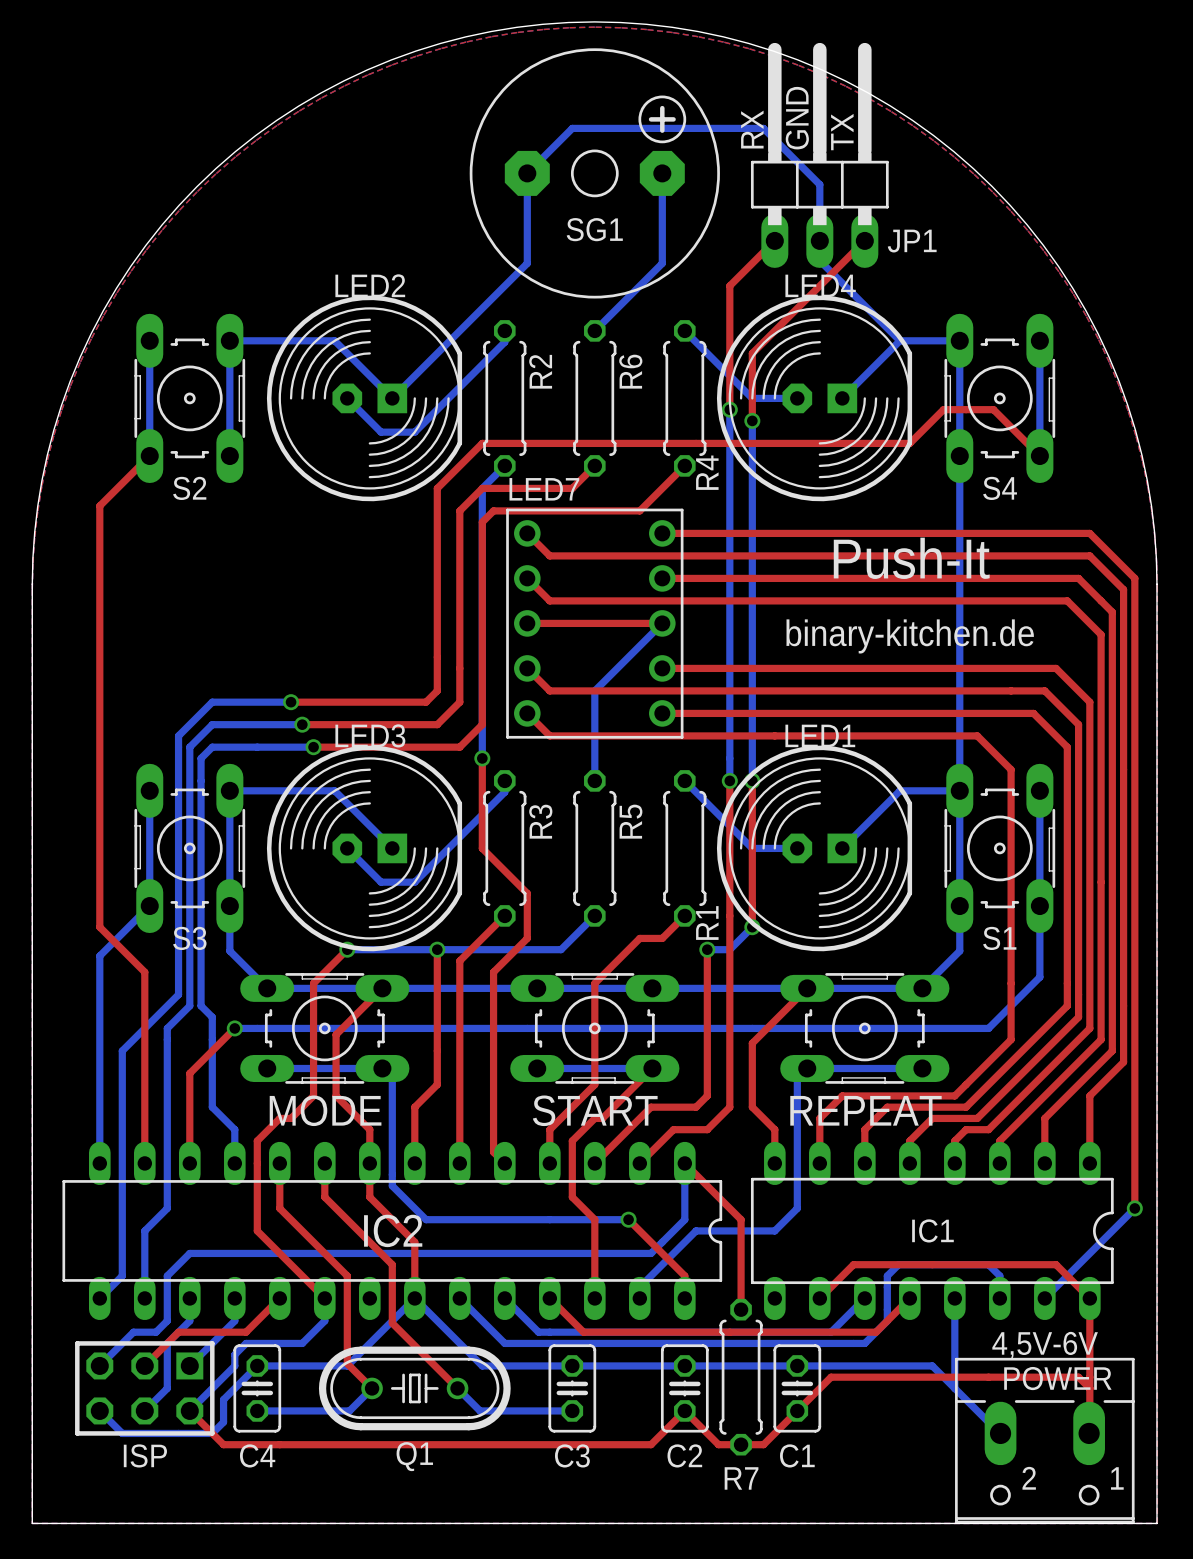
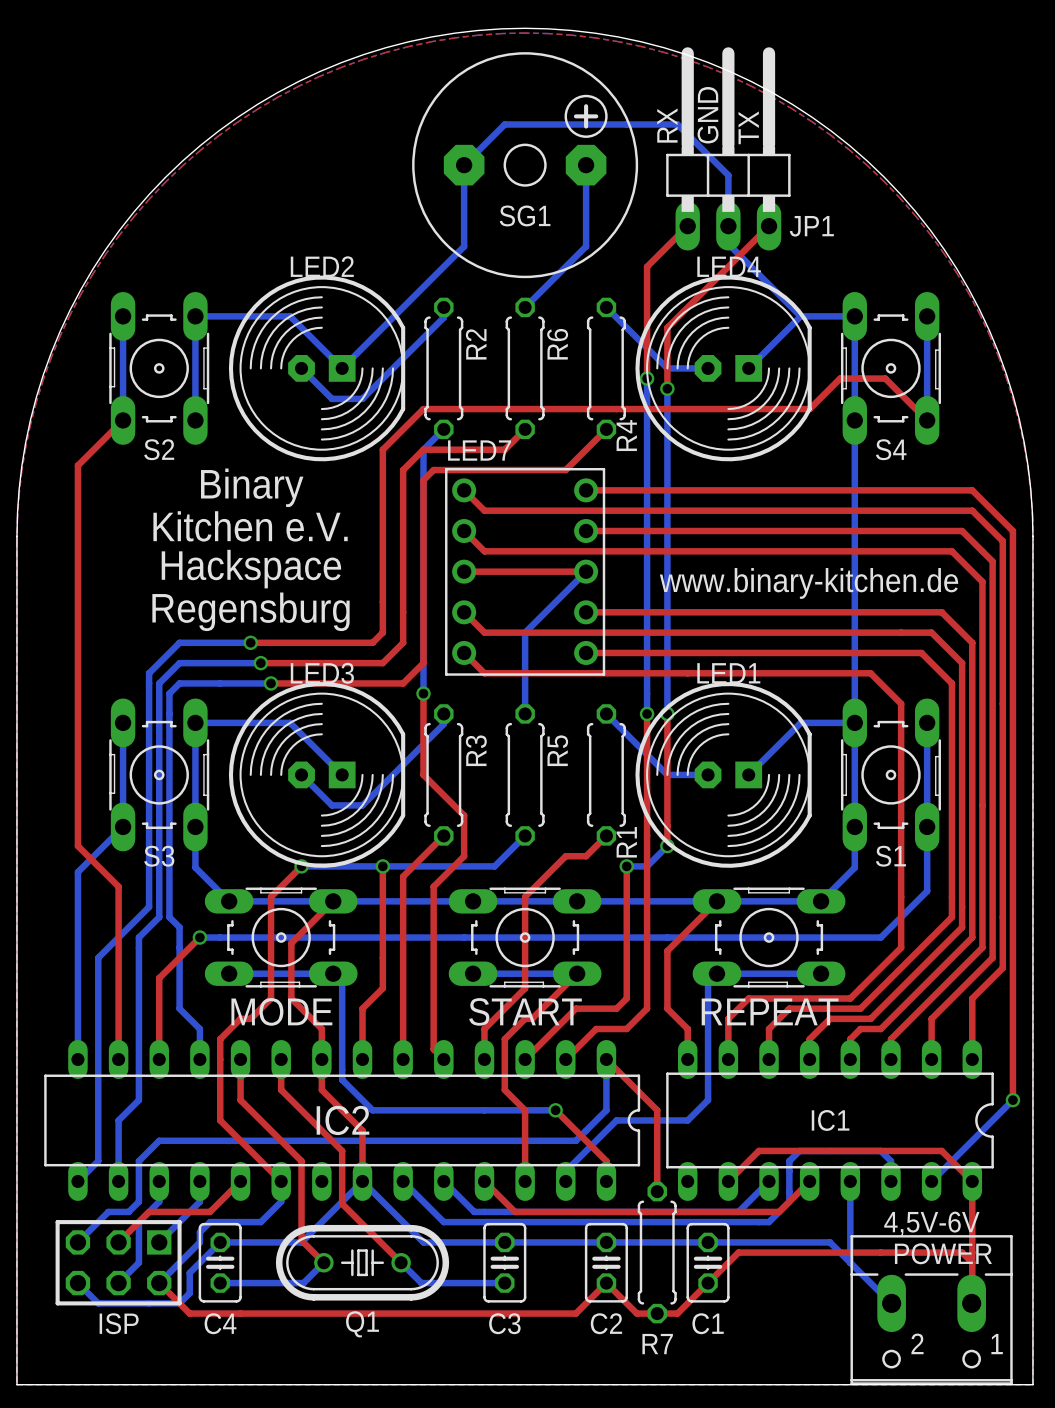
text: none -> Binary (252, 487)
text: Push-It (911, 558) -> none
text: none -> Kitchen e.V. (250, 526)
text: none -> Hackspace (251, 569)
text: binary-kitchen.de (910, 636) -> www.binary-kitchen.de (809, 583)
text: none -> Regensburg (251, 611)

